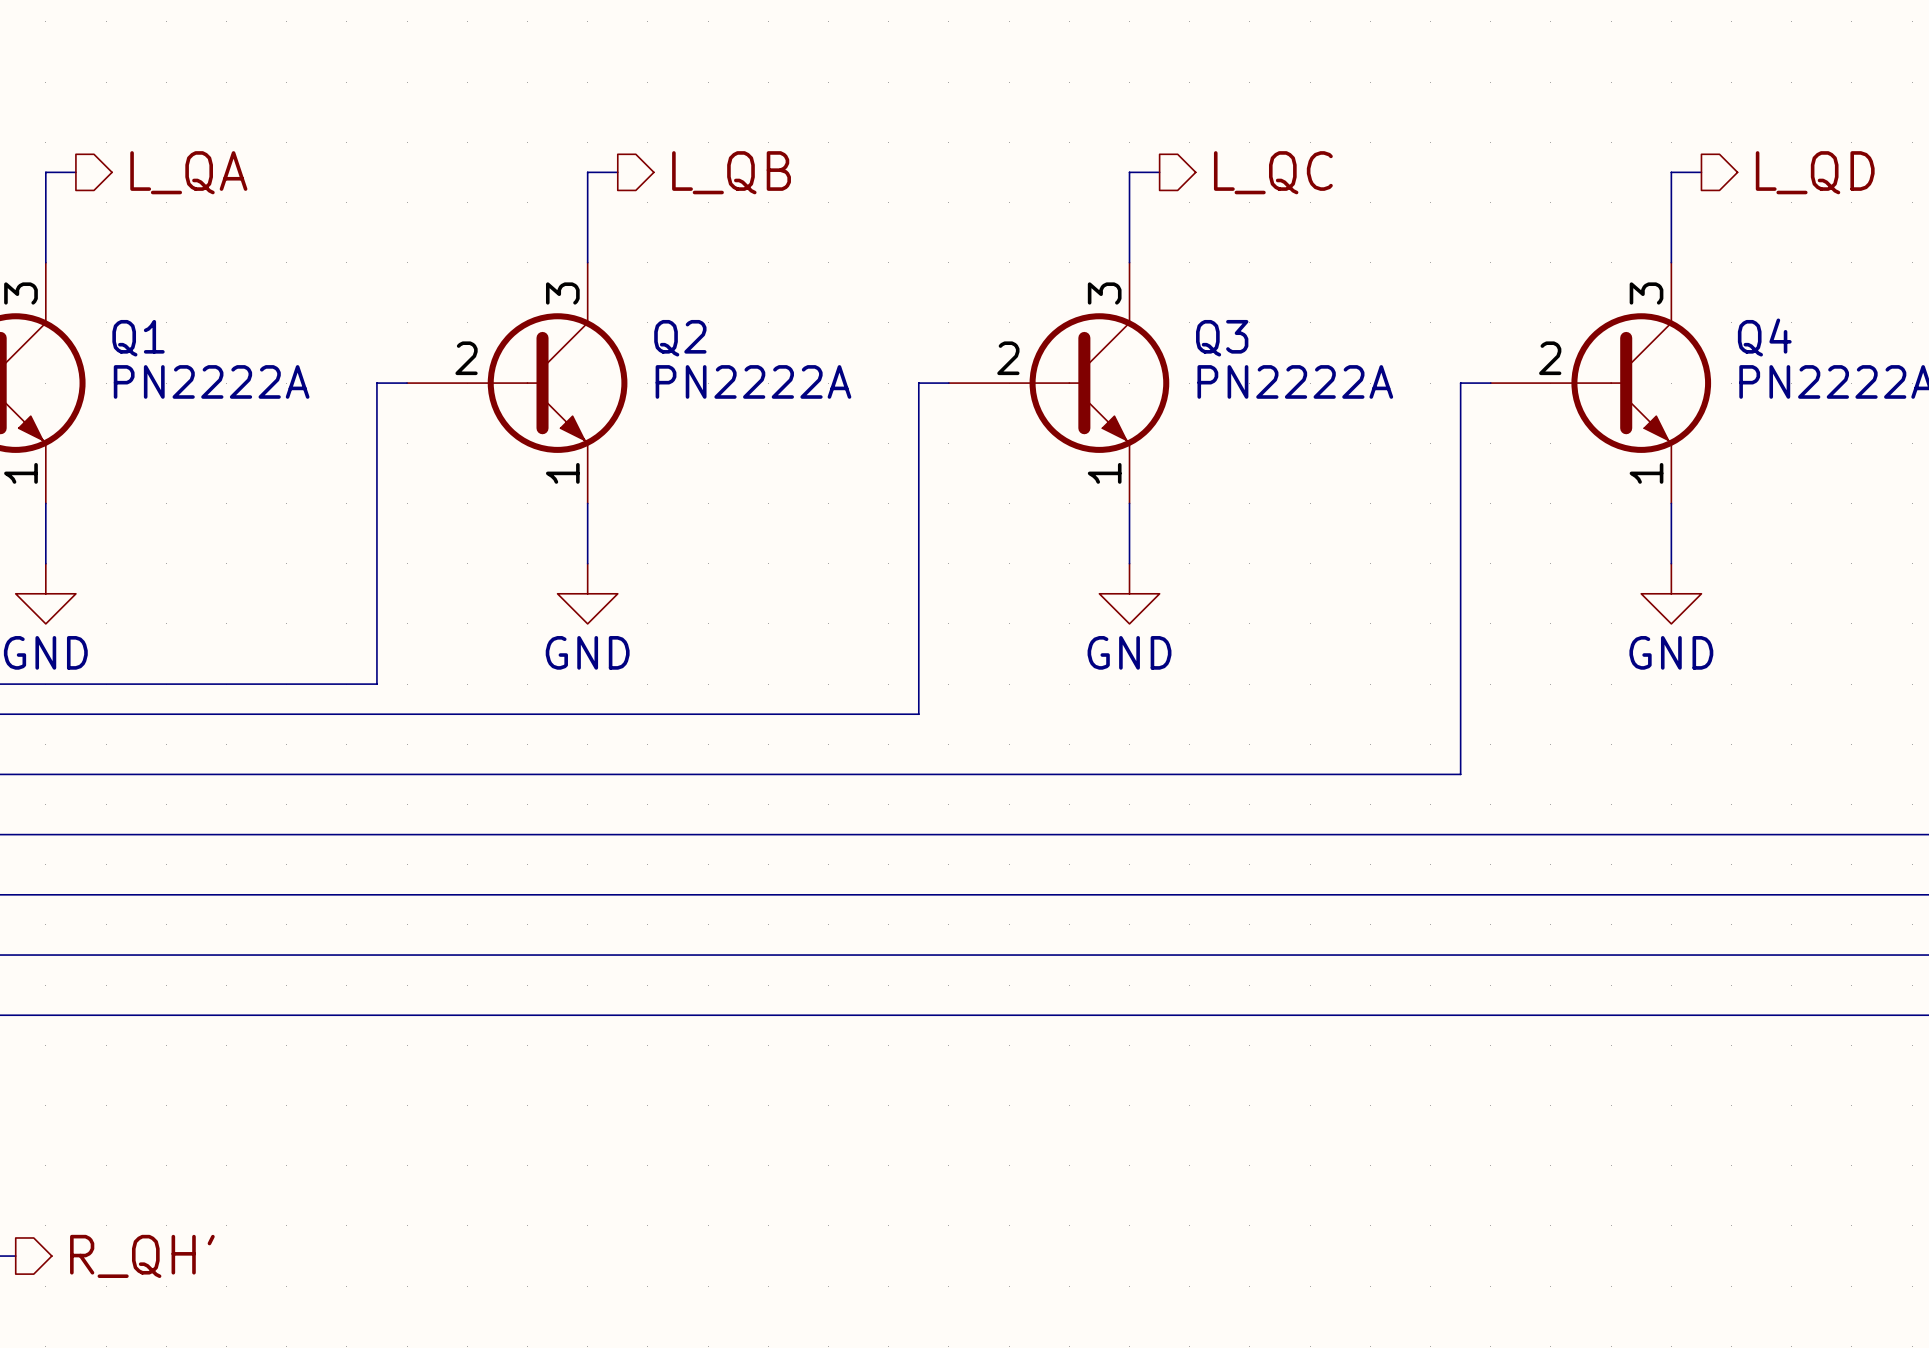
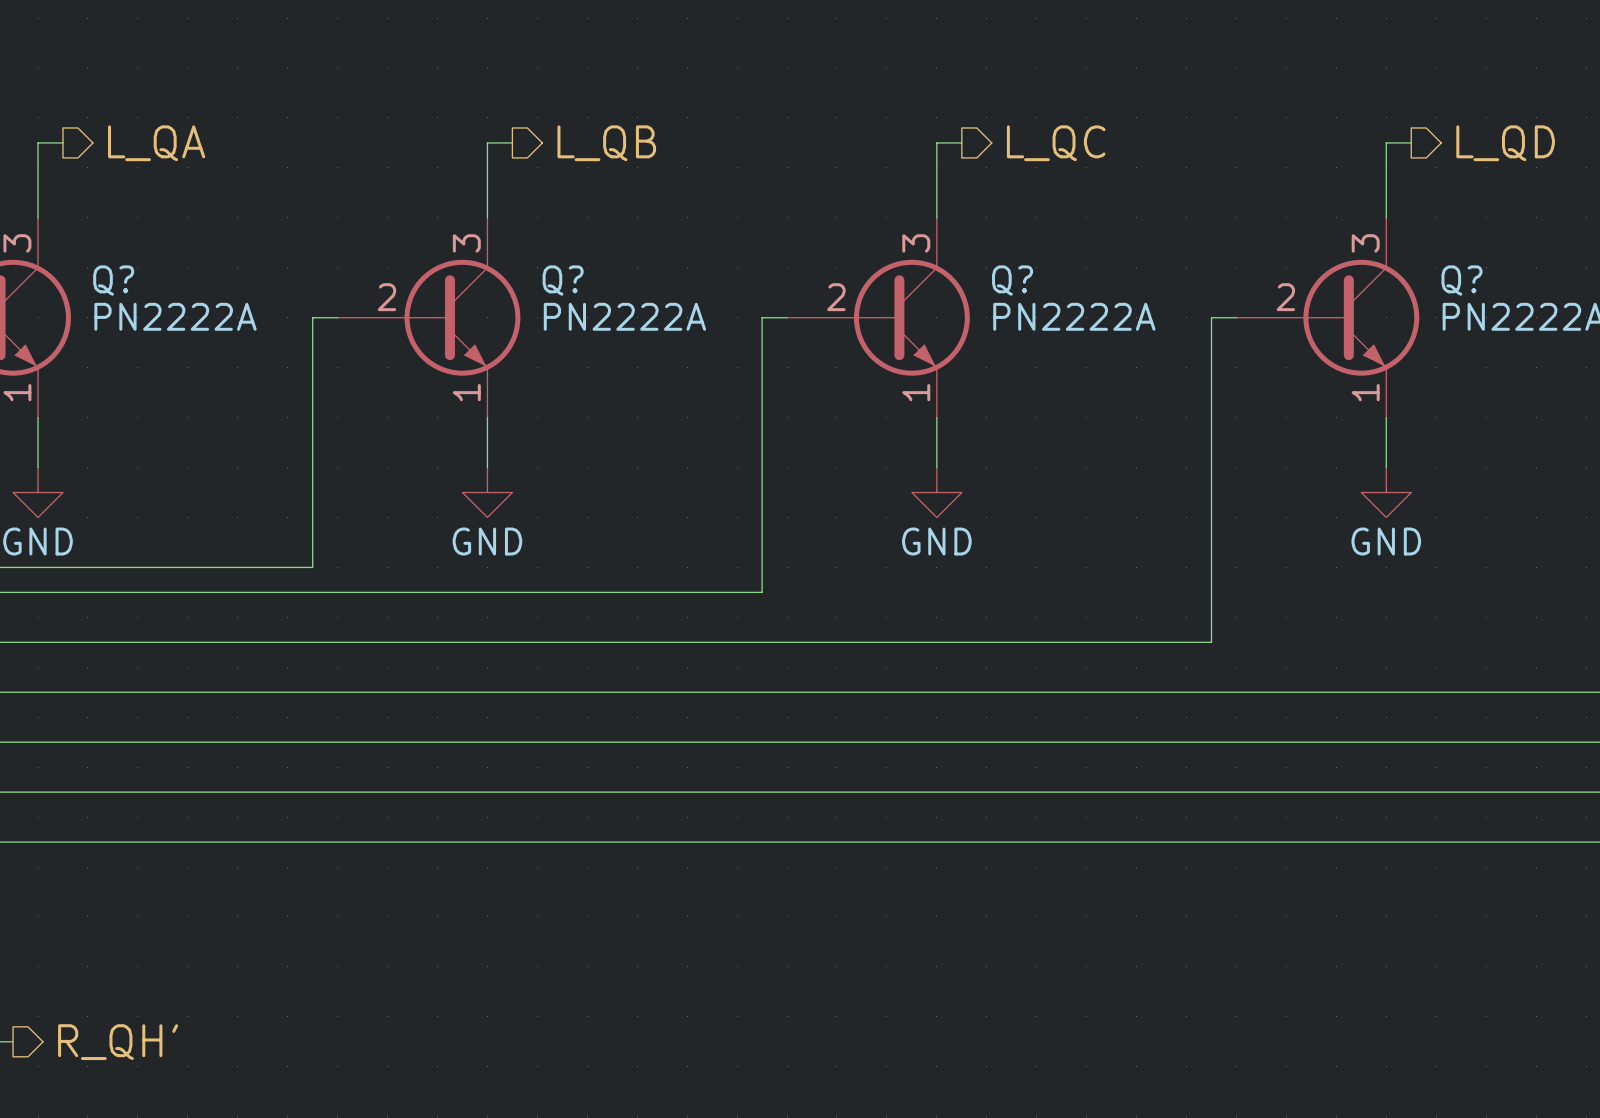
Q4 name: Q4 (1764, 337) -> Q? (1461, 280)
Q1 name: Q1 (138, 338) -> Q? (113, 280)
Q2 name: Q2 (680, 338) -> Q? (563, 280)
Q3 name: Q3 (1222, 338) -> Q? (1012, 280)

